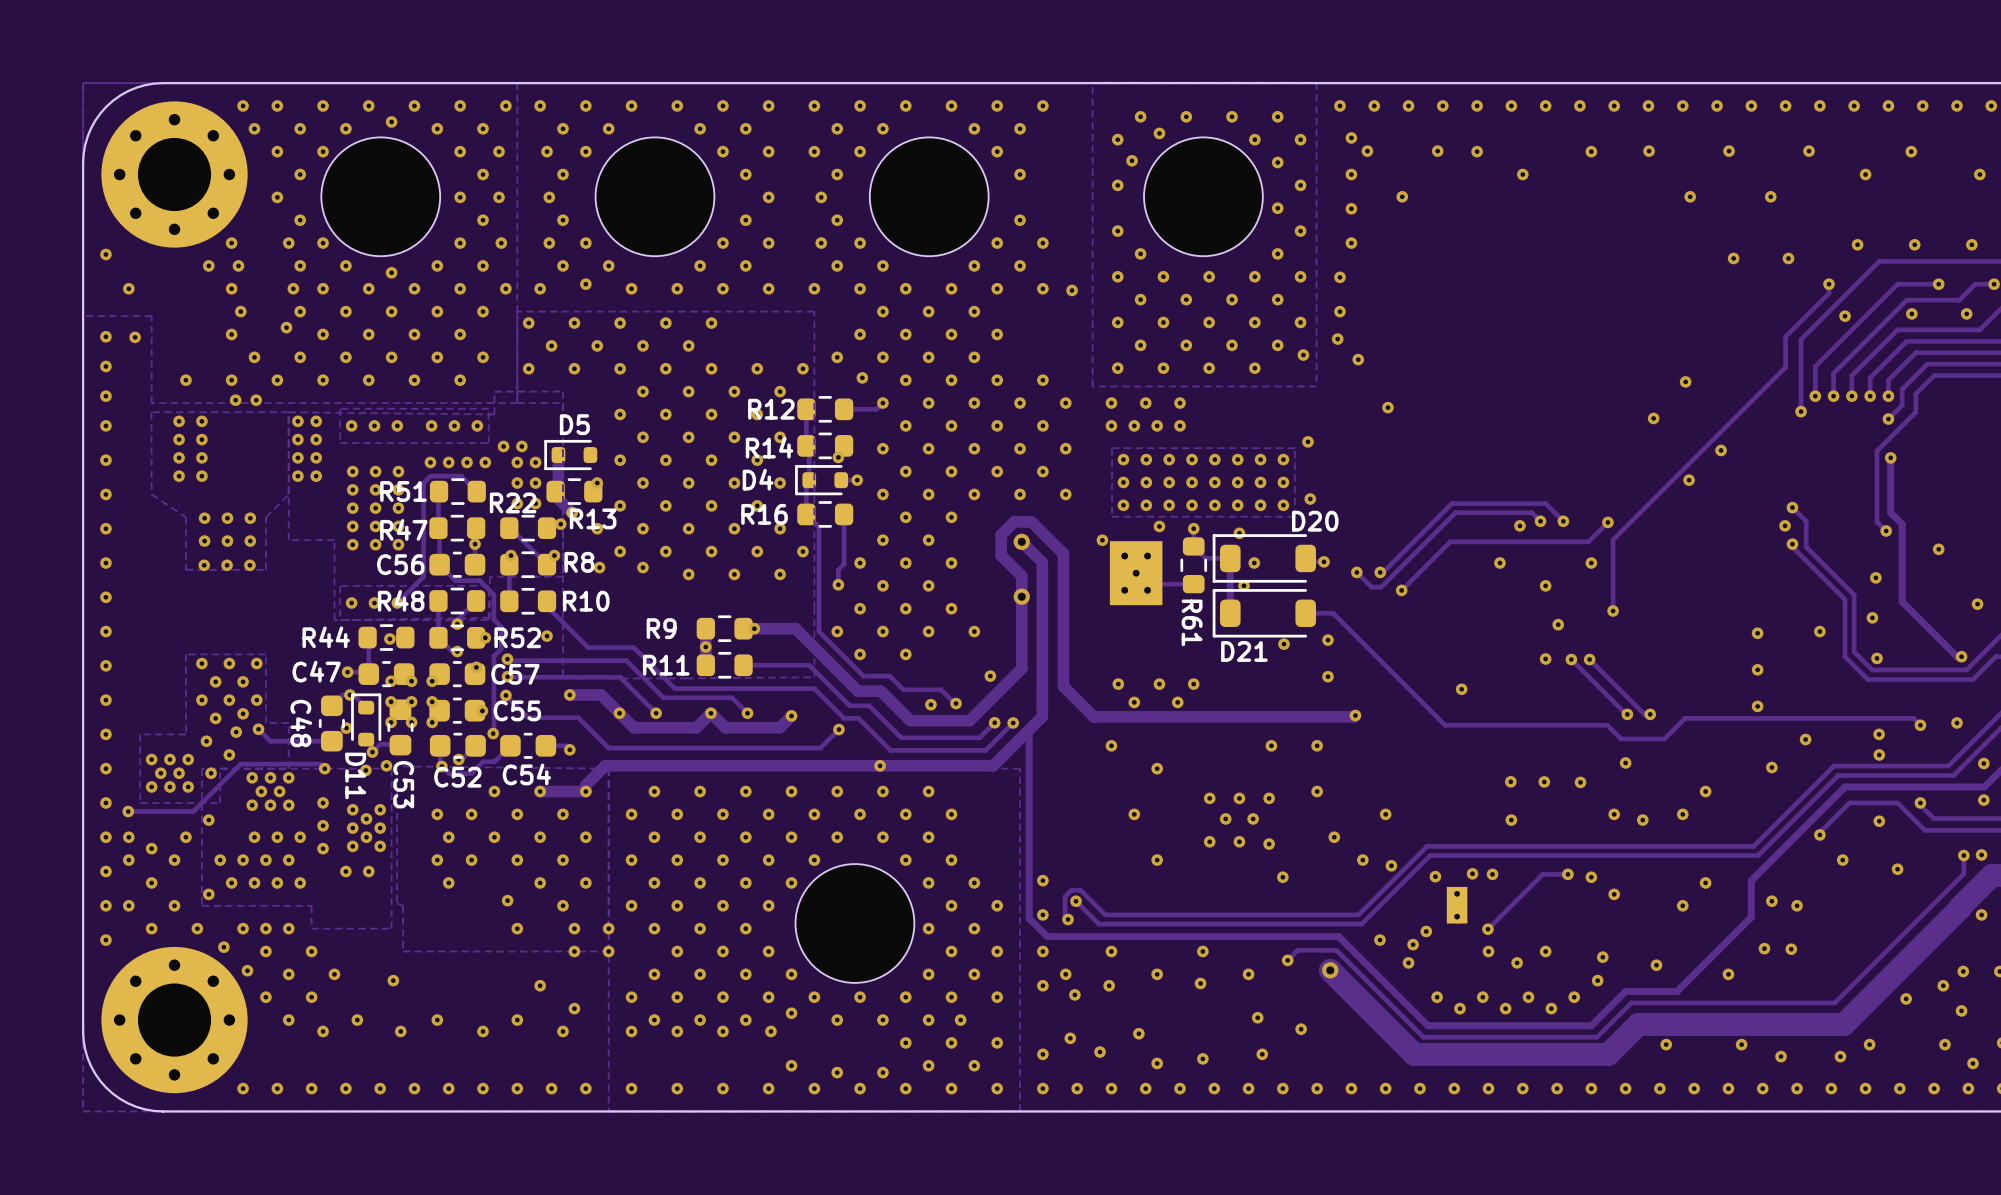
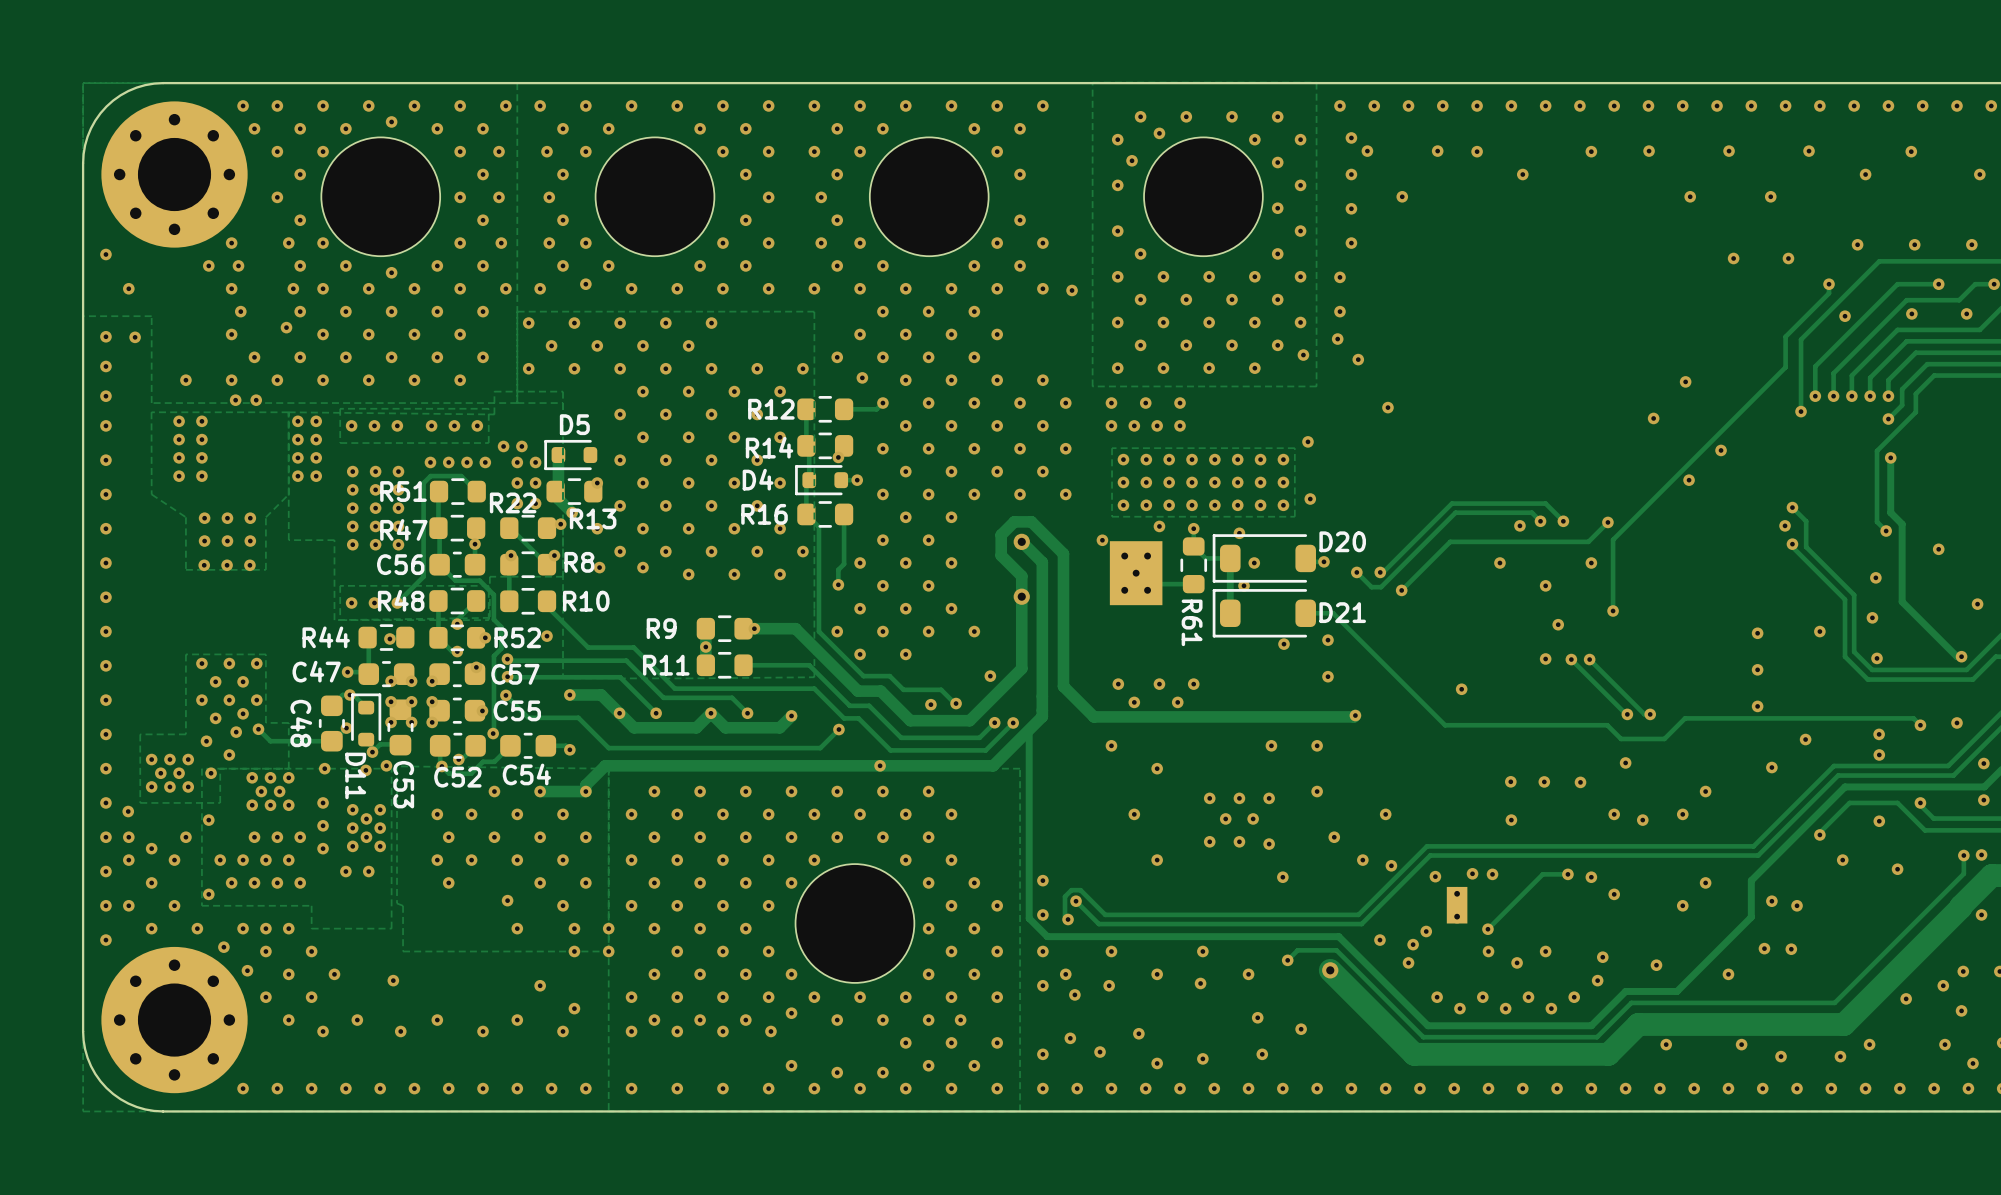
D20 name position: D20 (1315, 521) -> D20 (1342, 541)
D21 name position: D21 (1244, 651) -> D21 (1342, 612)
track: (324, 768) (320, 764) (240, 764) (193, 811) (128, 811) -> none

